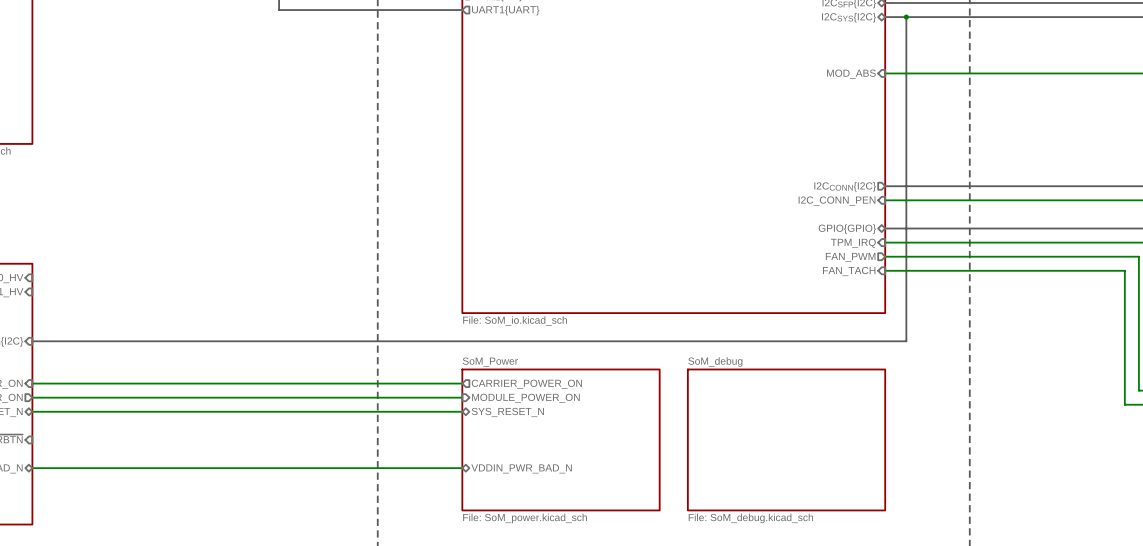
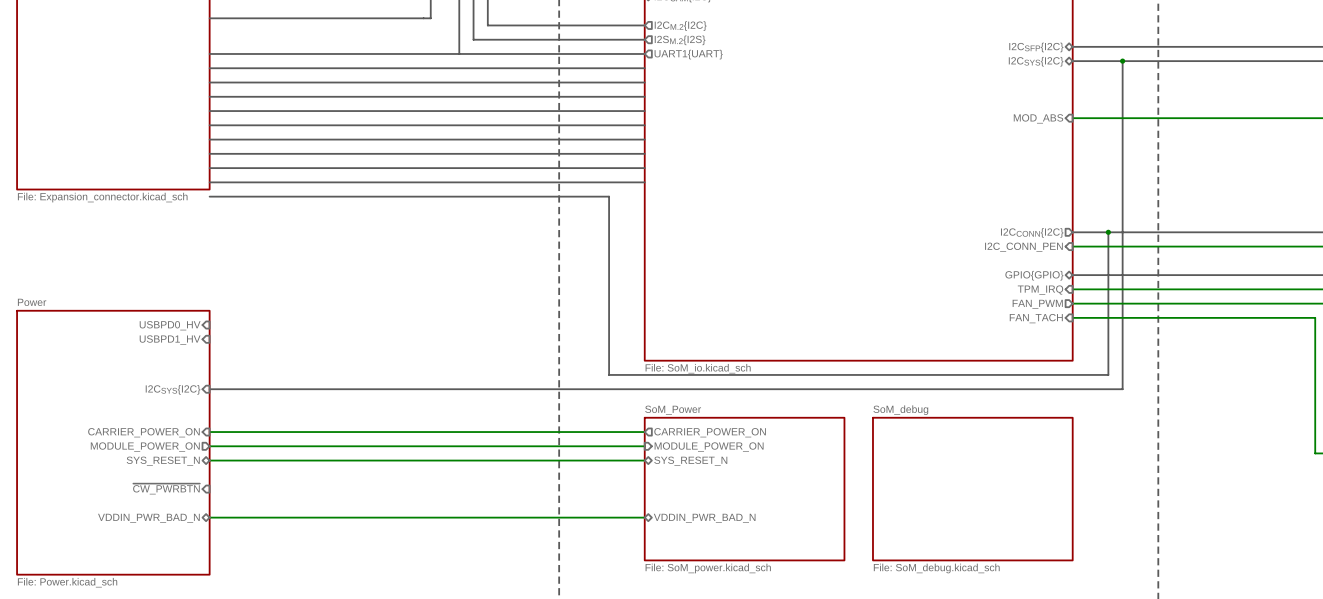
bus: none -> (209, 53) (459, 53)
bus: (906, 17) (906, 341) -> (1122, 61) (1122, 389) (1094, 389)
junction position: (906, 17) -> (1122, 61)
bus: none -> (209, 68) (644, 68)
bus: none -> (209, 82) (644, 82)
bus: none -> (209, 96) (644, 96)
bus: none -> (209, 111) (644, 111)
bus: none -> (209, 125) (644, 125)
bus: none -> (209, 139) (644, 139)
bus: none -> (209, 153) (644, 153)
bus: none -> (209, 168) (644, 168)
bus: none -> (209, 182) (644, 182)
bus: none -> (209, 196) (609, 196) (609, 374) (1108, 374) (1108, 232)
junction: none -> (1108, 232)

